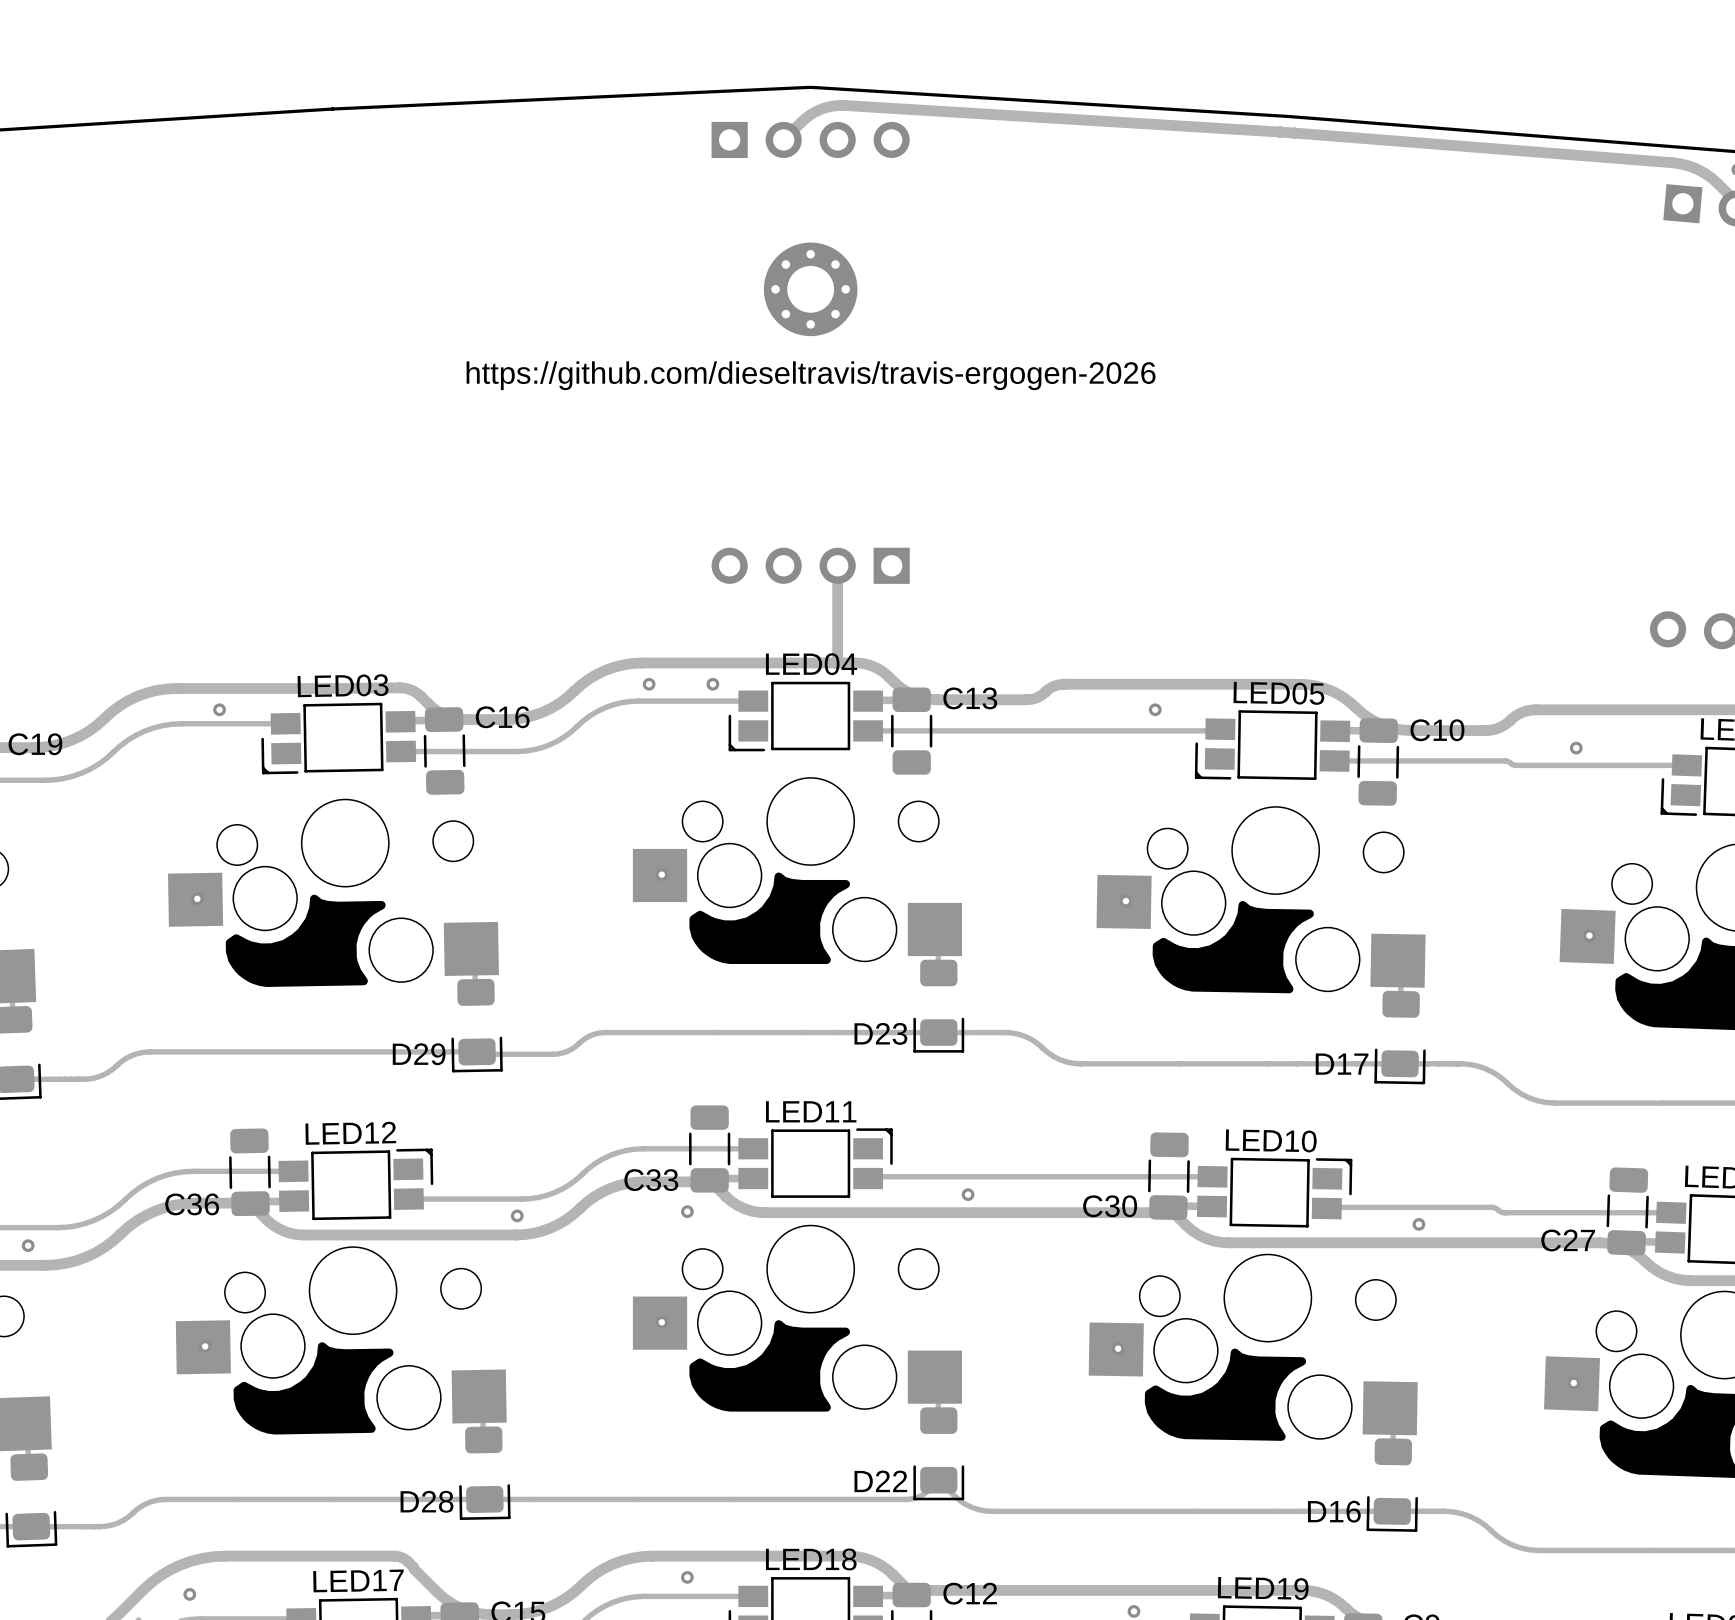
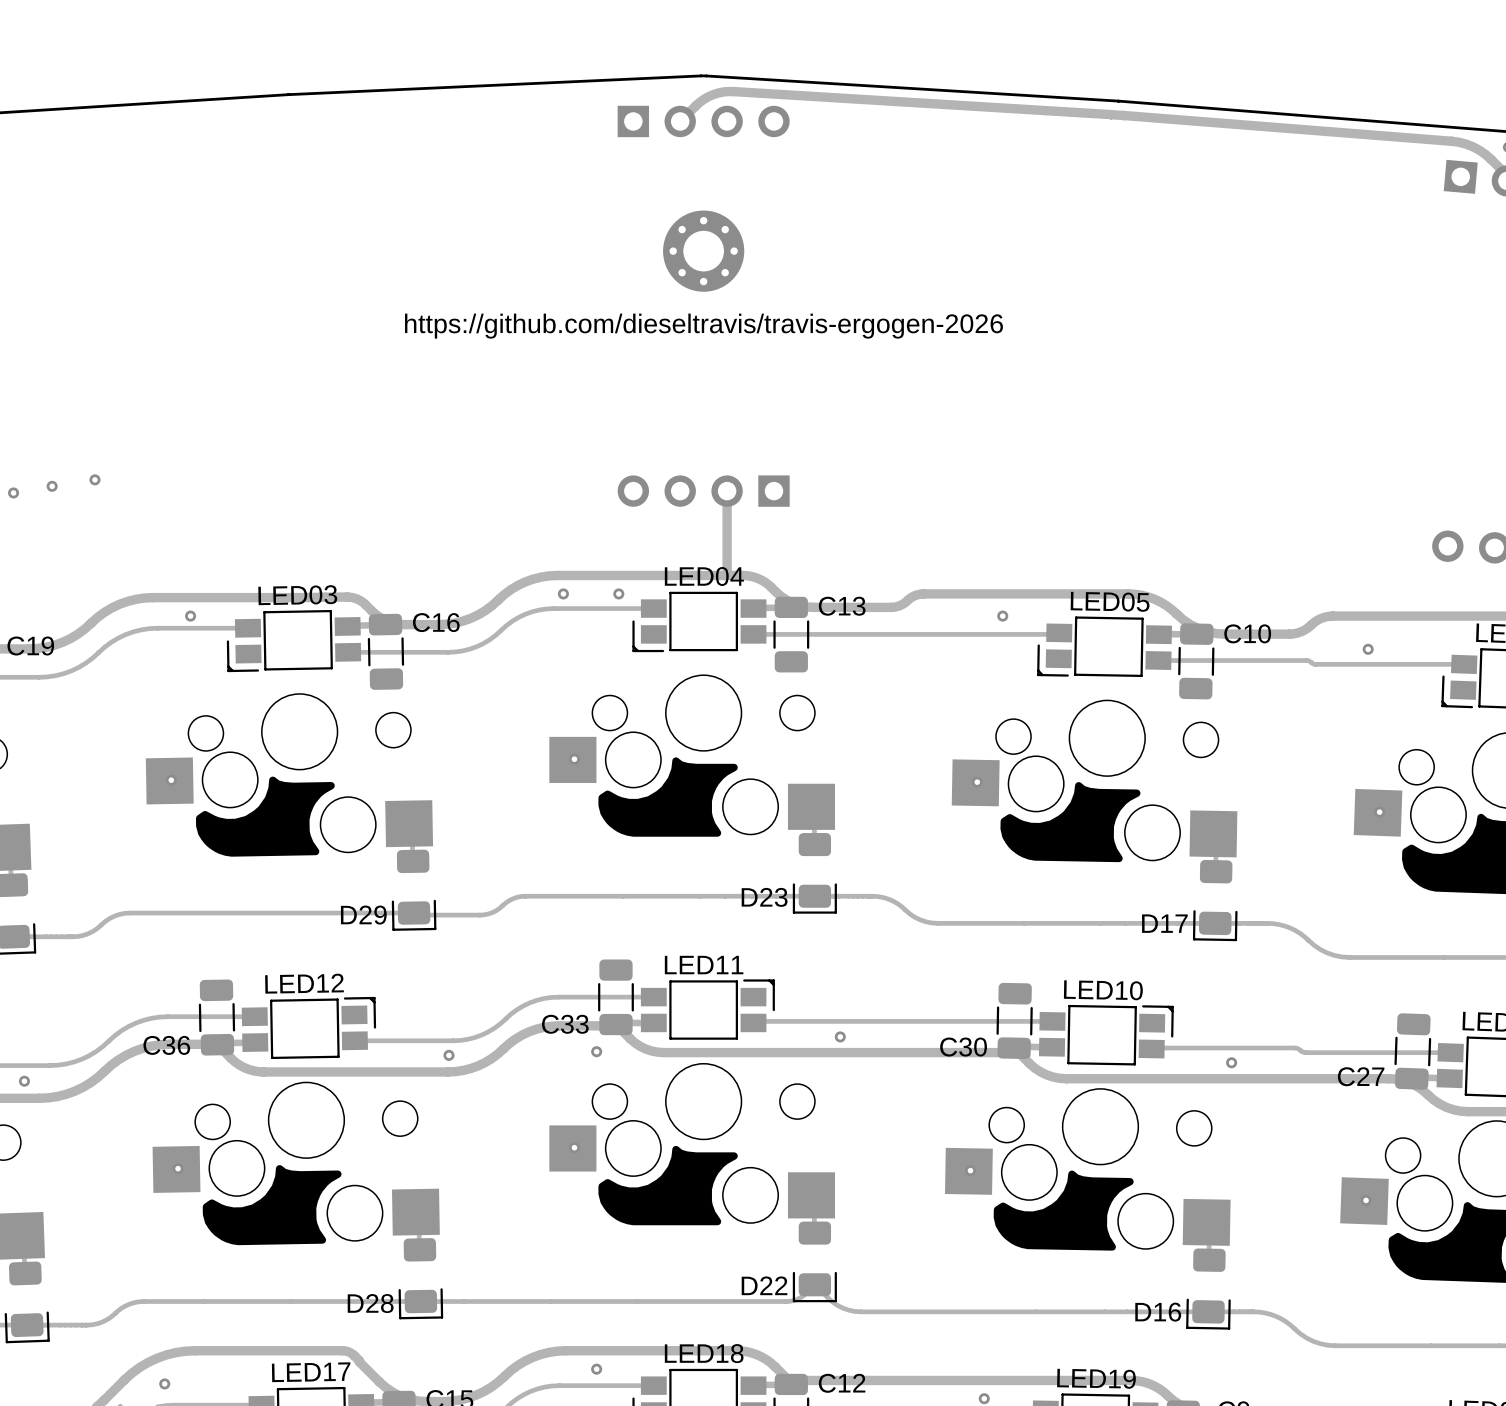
via: none -> (94, 479)
via: none -> (52, 486)
via: none -> (13, 492)

